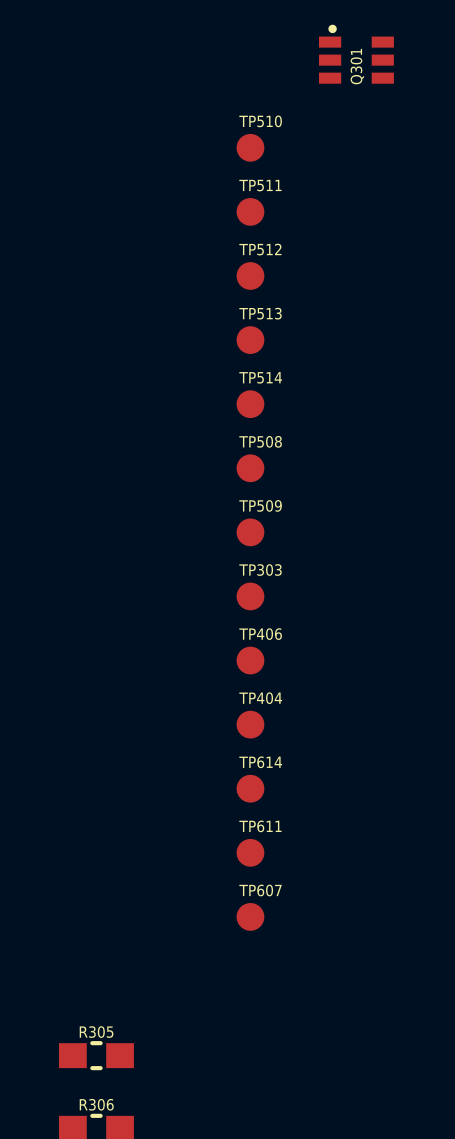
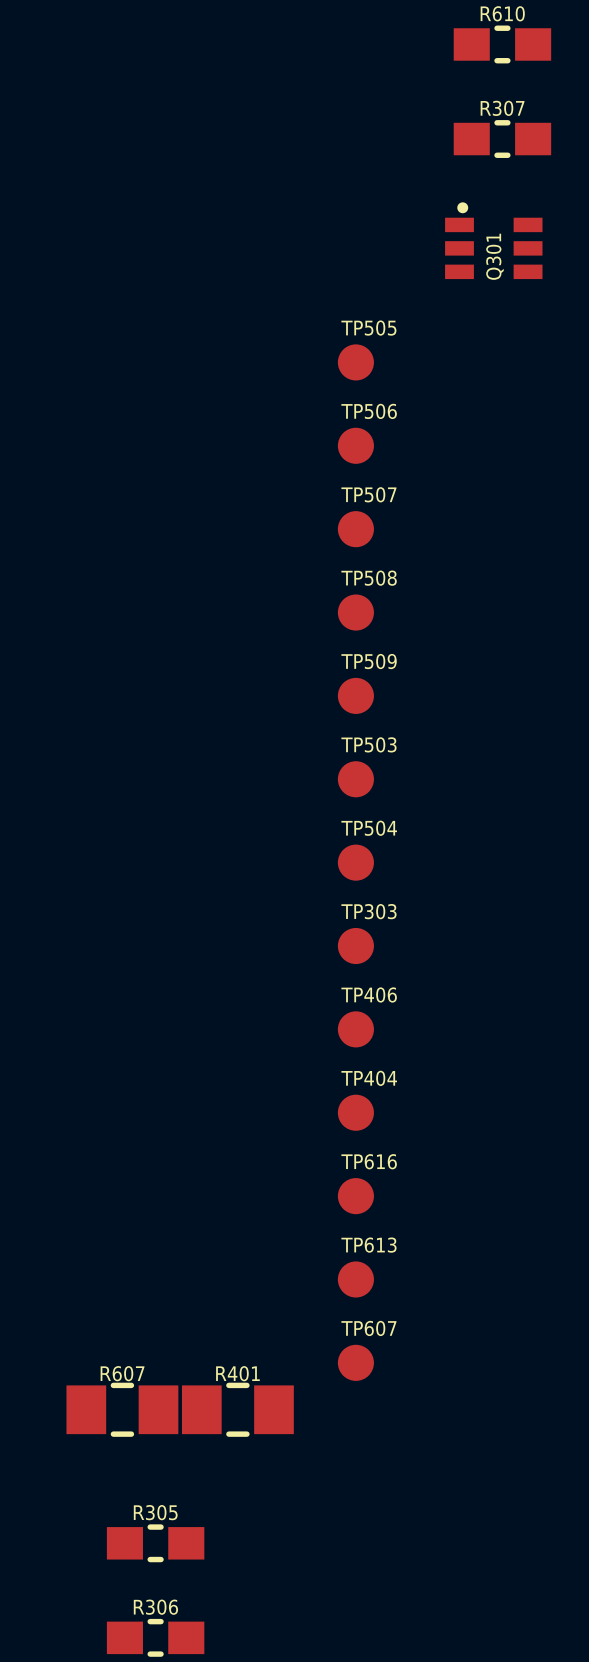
TP510 name: TP510 (260, 121) -> TP505 (368, 328)
TP511 name: TP511 (260, 185) -> TP506 (369, 411)
TP512 name: TP512 (260, 249) -> TP507 (368, 494)
TP513 name: TP513 (260, 313) -> TP508 (369, 578)
TP514 name: TP514 (260, 377) -> TP509 (369, 661)
TP508 name: TP508 (260, 441) -> TP503 (368, 744)
TP509 name: TP509 (260, 505) -> TP504 (369, 828)
TP614 name: TP614 (260, 762) -> TP616 (369, 1161)
TP611 name: TP611 (260, 826) -> TP613 (368, 1245)
R607: none -> (122, 1409)
R401: none -> (237, 1409)

